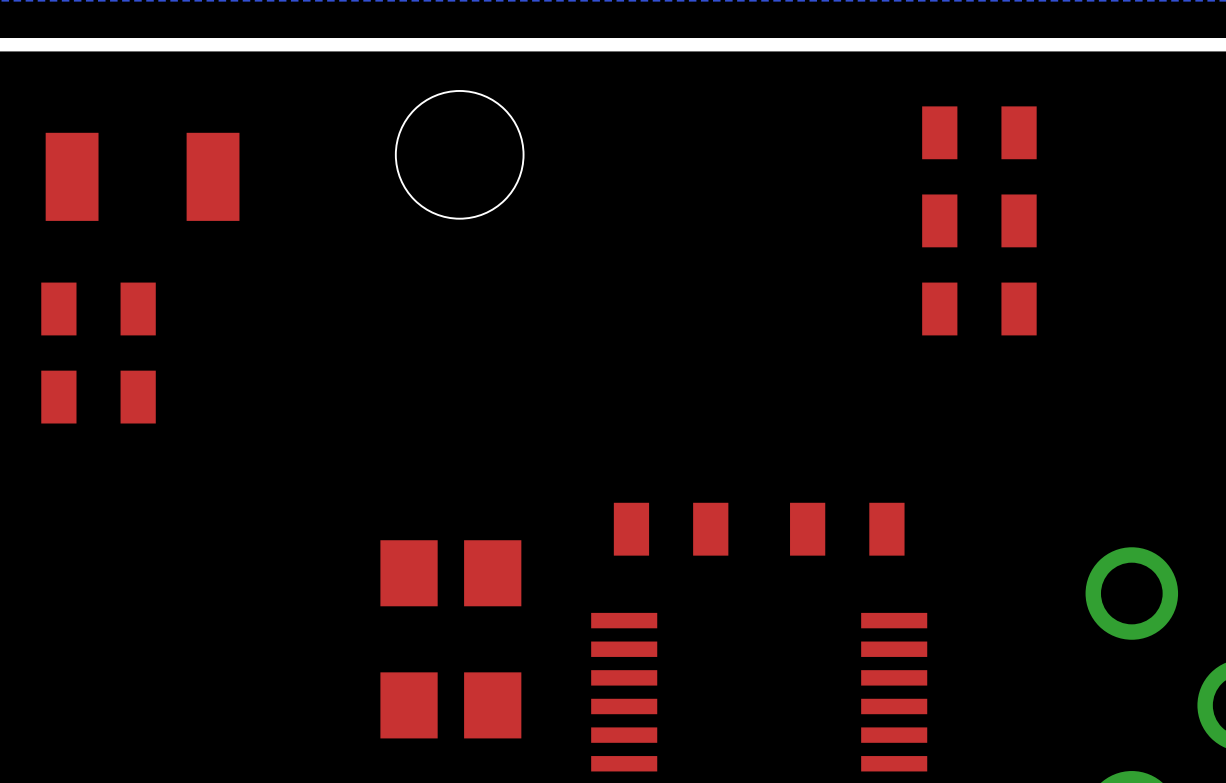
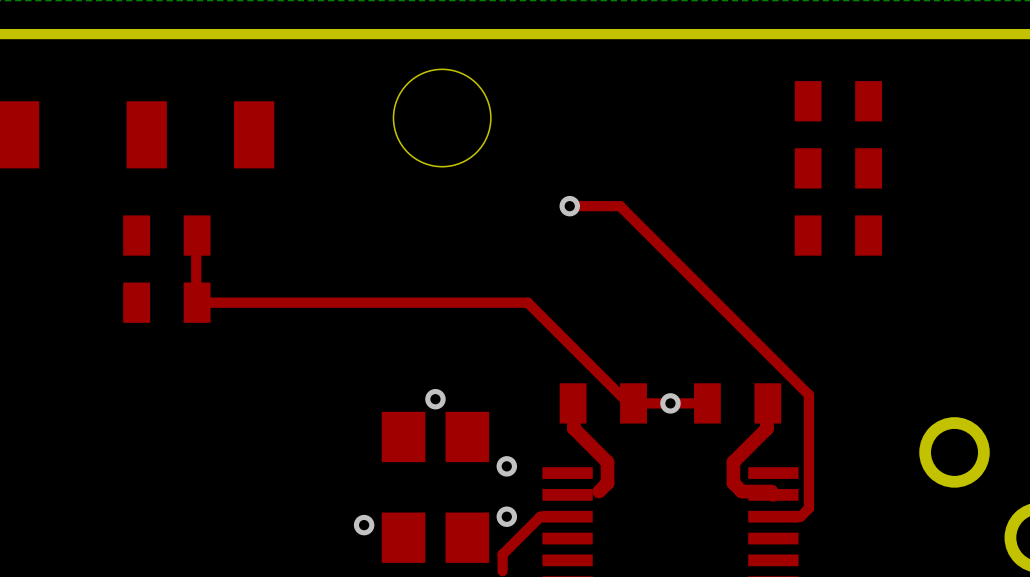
top track: none -> (569, 206) (620, 206) (808, 395) (808, 508) (800, 516) (773, 516)
via: none -> (569, 206)
top track: none -> (197, 235) (196, 302) (527, 302) (628, 403) (707, 403)
via: none -> (435, 399)
top track: none -> (573, 403) (573, 428) (607, 462) (607, 483) (599, 491)
via: none -> (670, 403)
top track: none -> (767, 403) (767, 428) (733, 462) (733, 483) (741, 491) (771, 491) (773, 494)
via: none -> (506, 466)
via: none -> (506, 516)
top track: none -> (567, 516) (540, 516) (502, 554) (502, 571)
via: none -> (364, 525)

